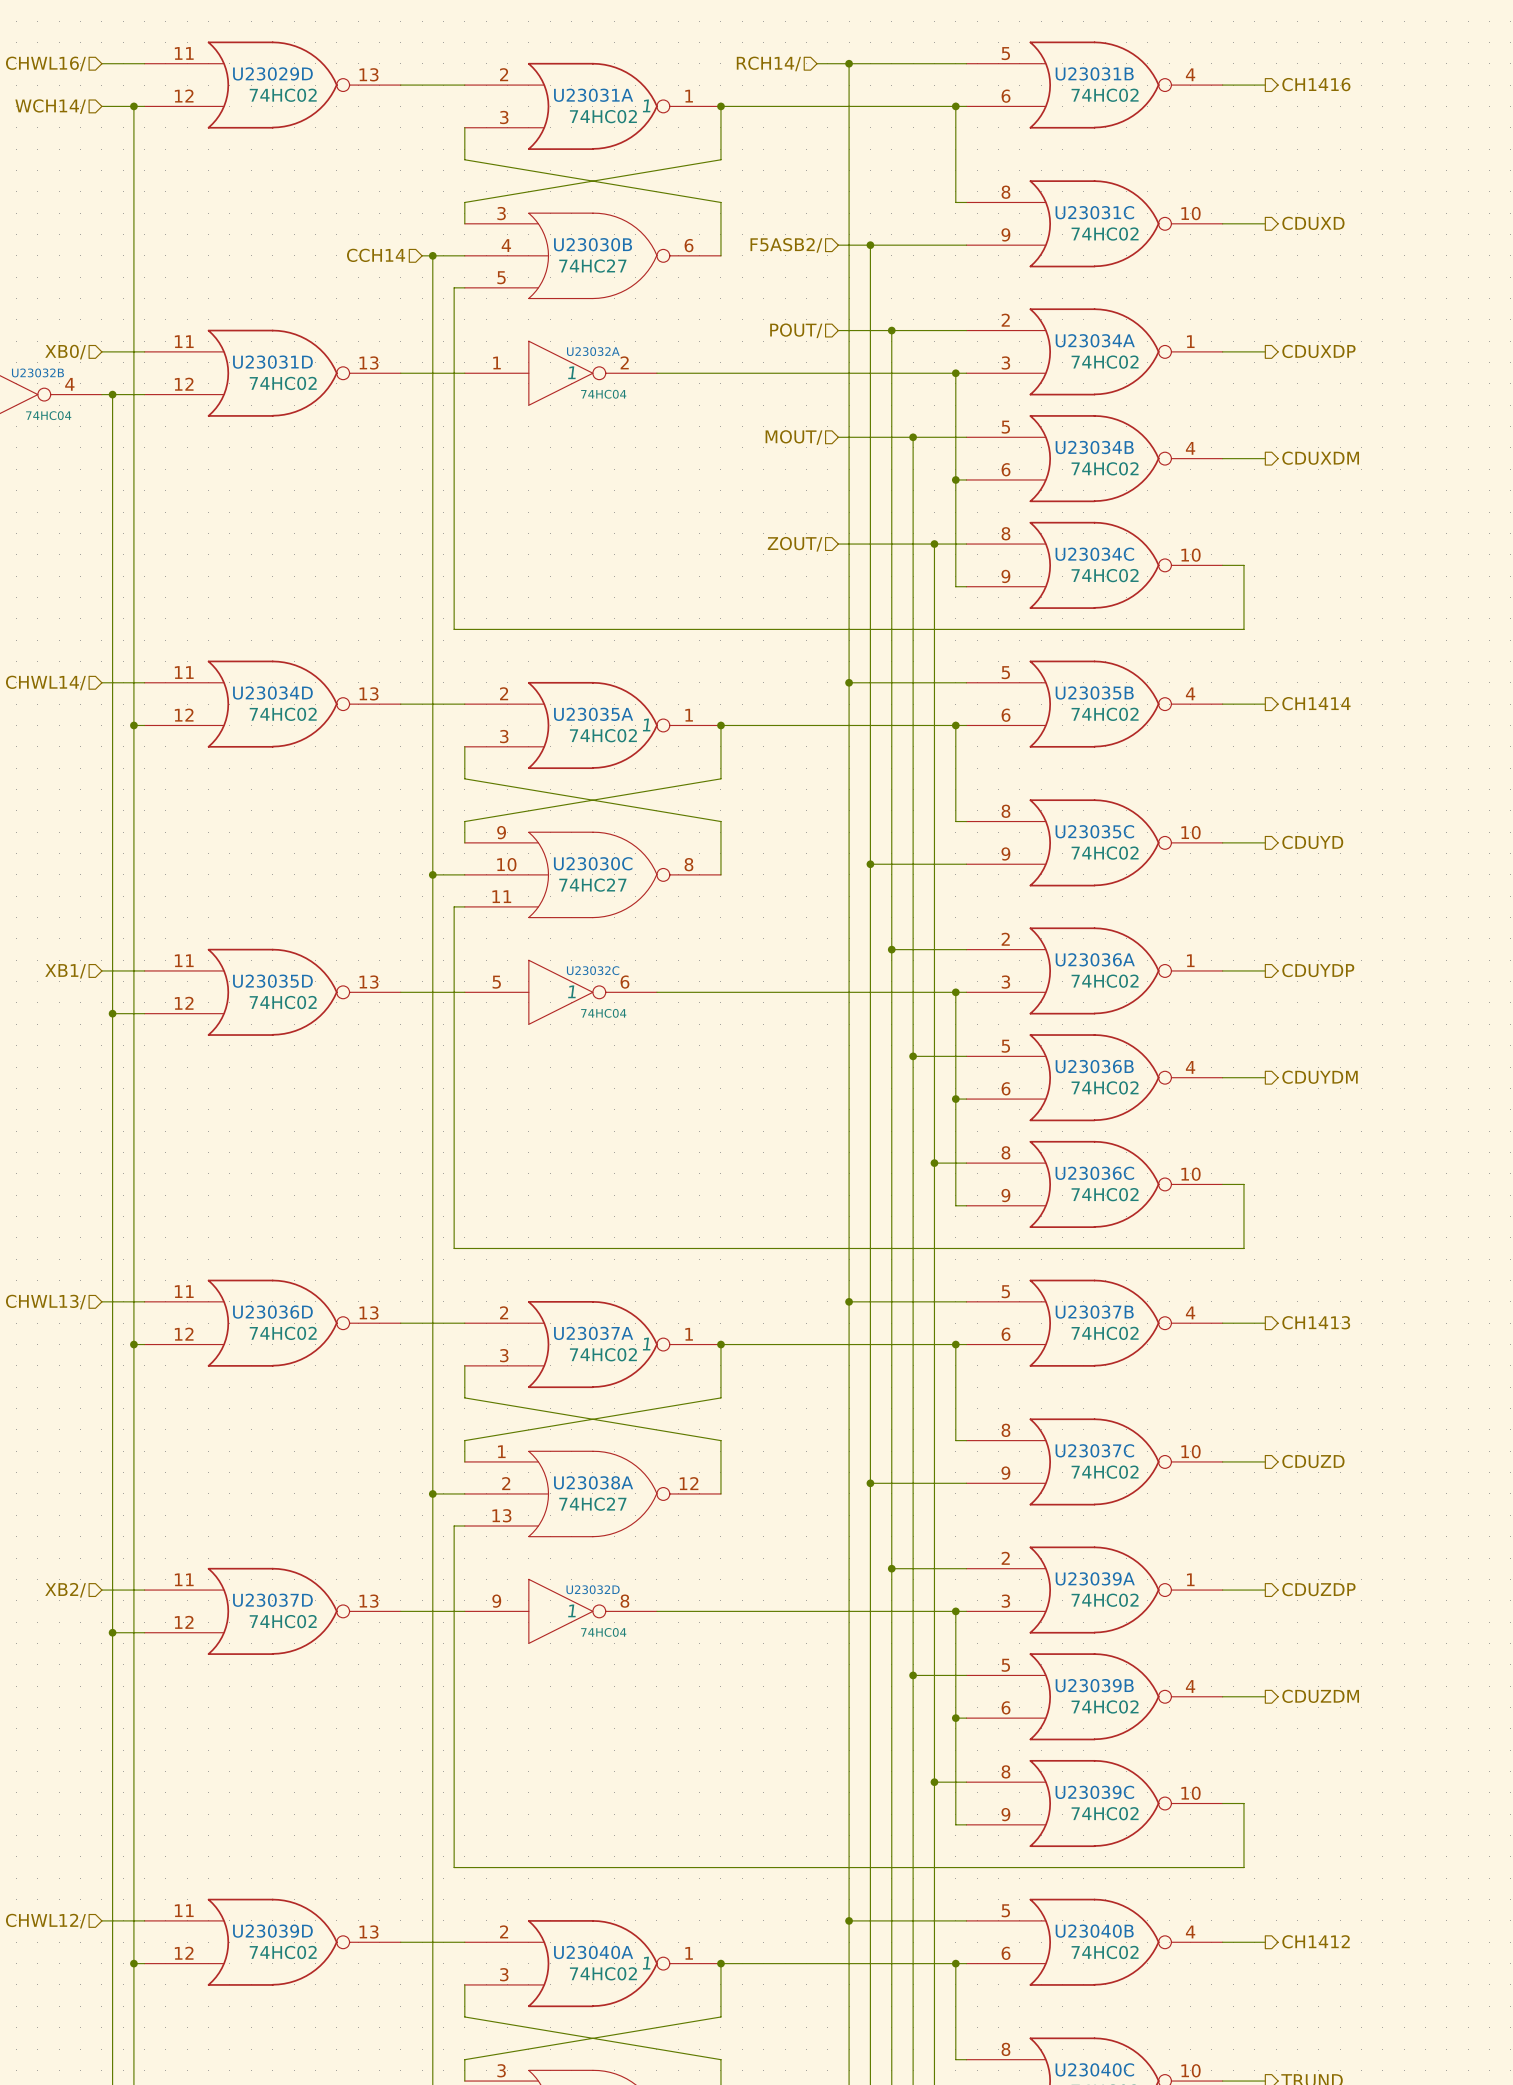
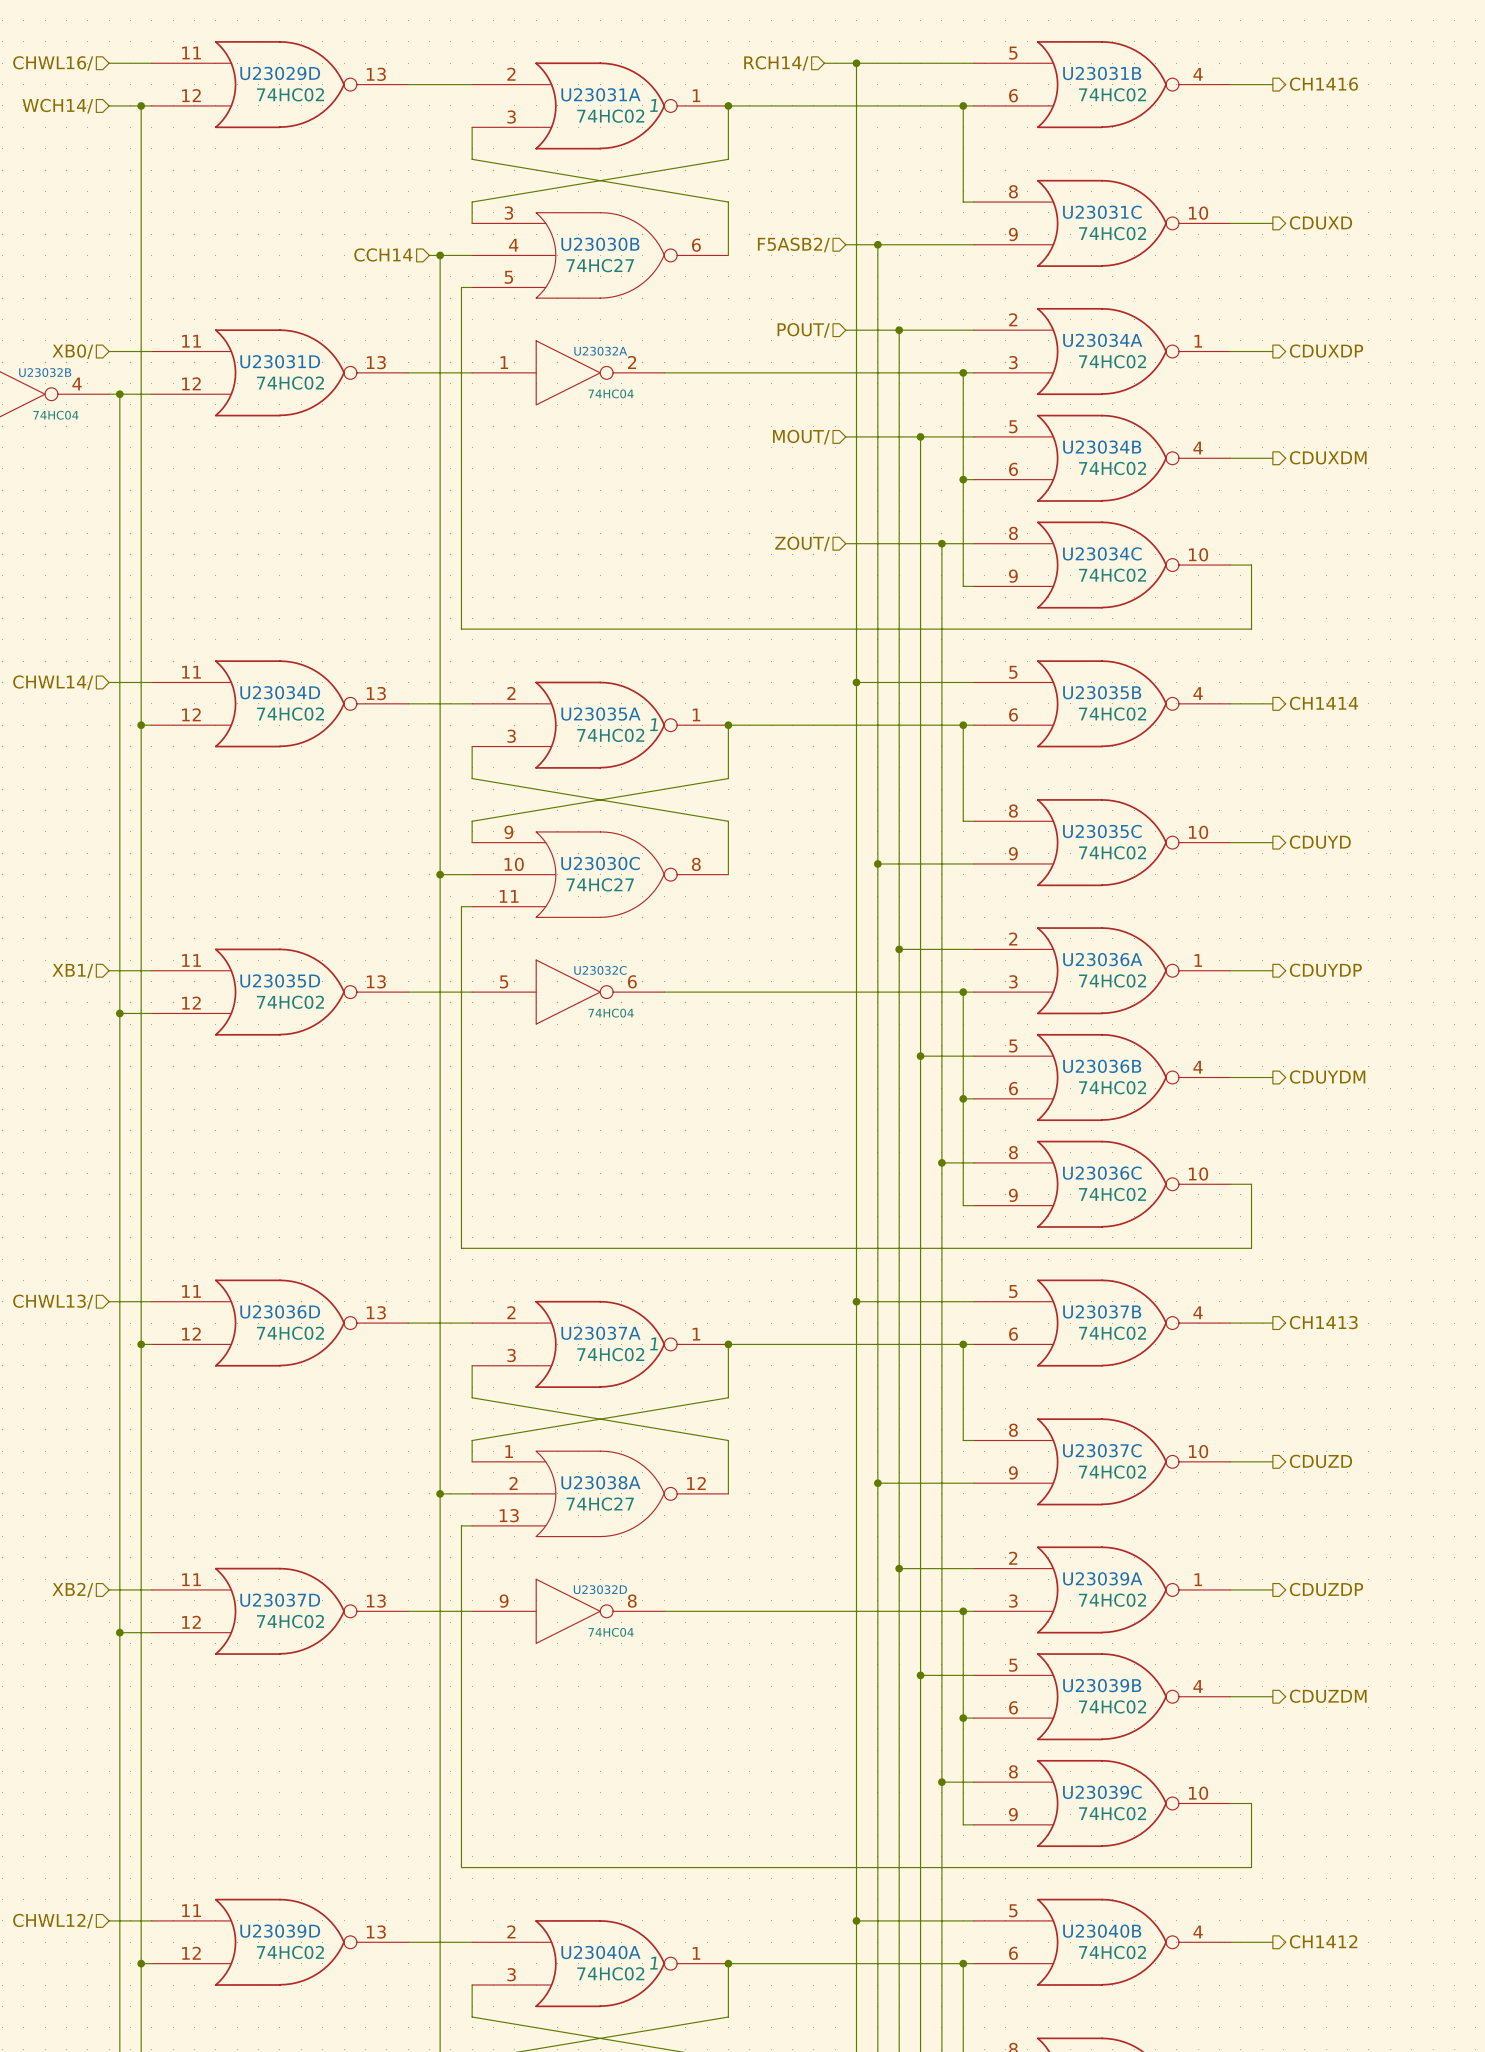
U23032A text: 1 (571, 372) -> none
U23032C text: 1 (571, 991) -> none
U23032D text: 1 (571, 1610) -> none

